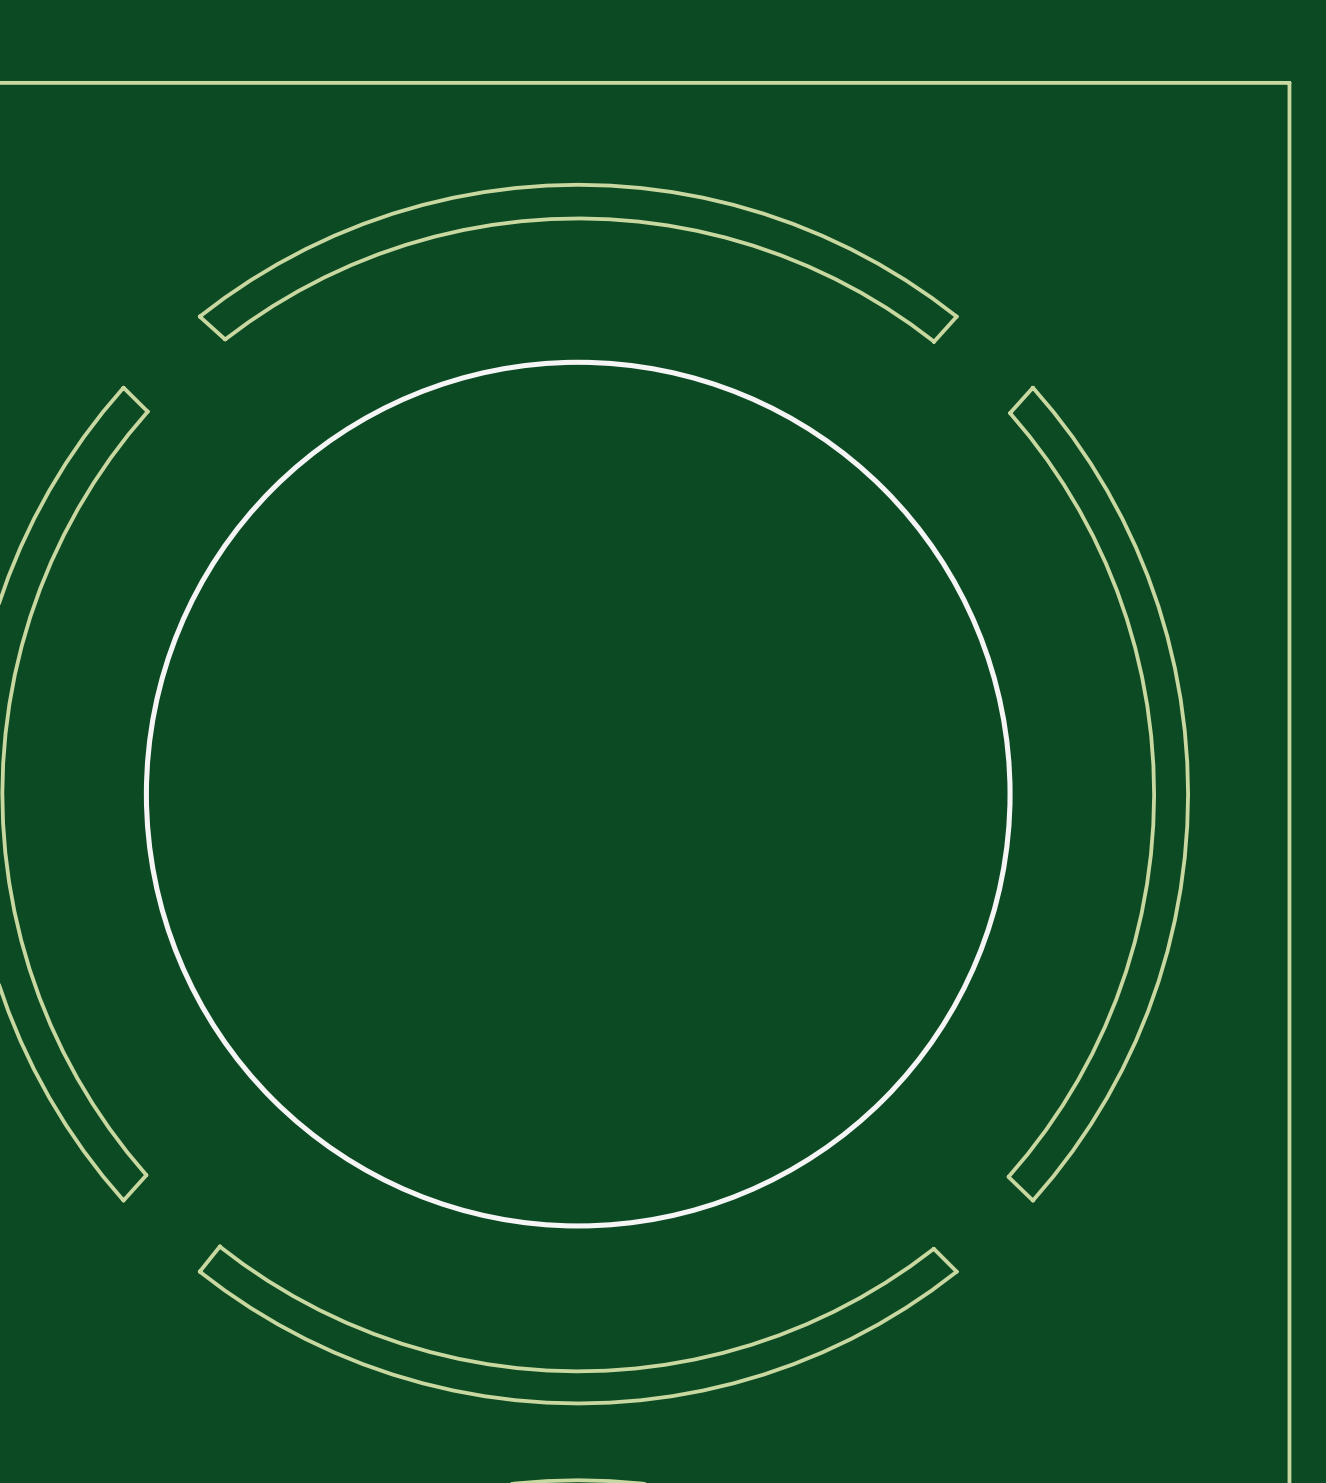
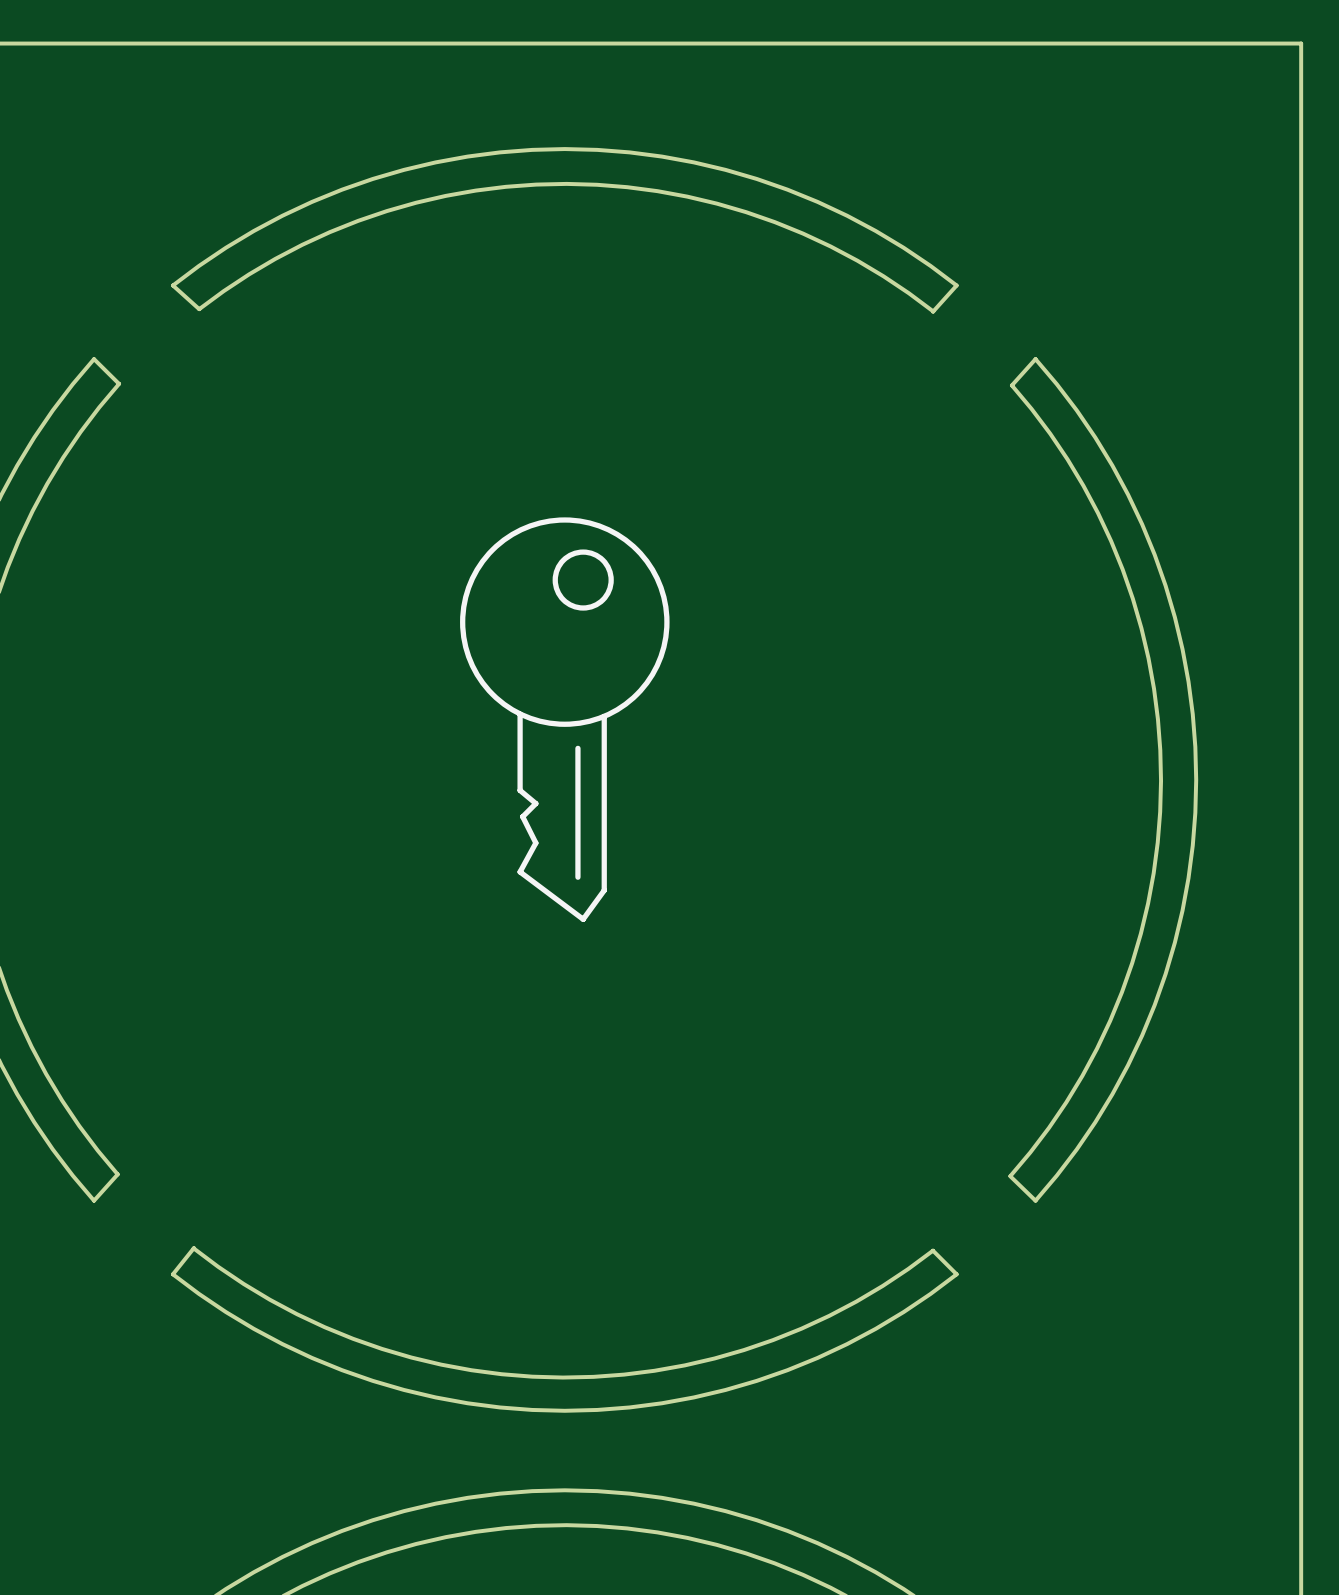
drawing: [143, 359, 1013, 1229] -> none
drawing: none -> [460, 517, 670, 727]
line: none -> (520, 714) (520, 790) (535, 803) (522, 816) (535, 843) (520, 871) (583, 919) (604, 890) (604, 716)
line: none -> (577, 748) (577, 877)

